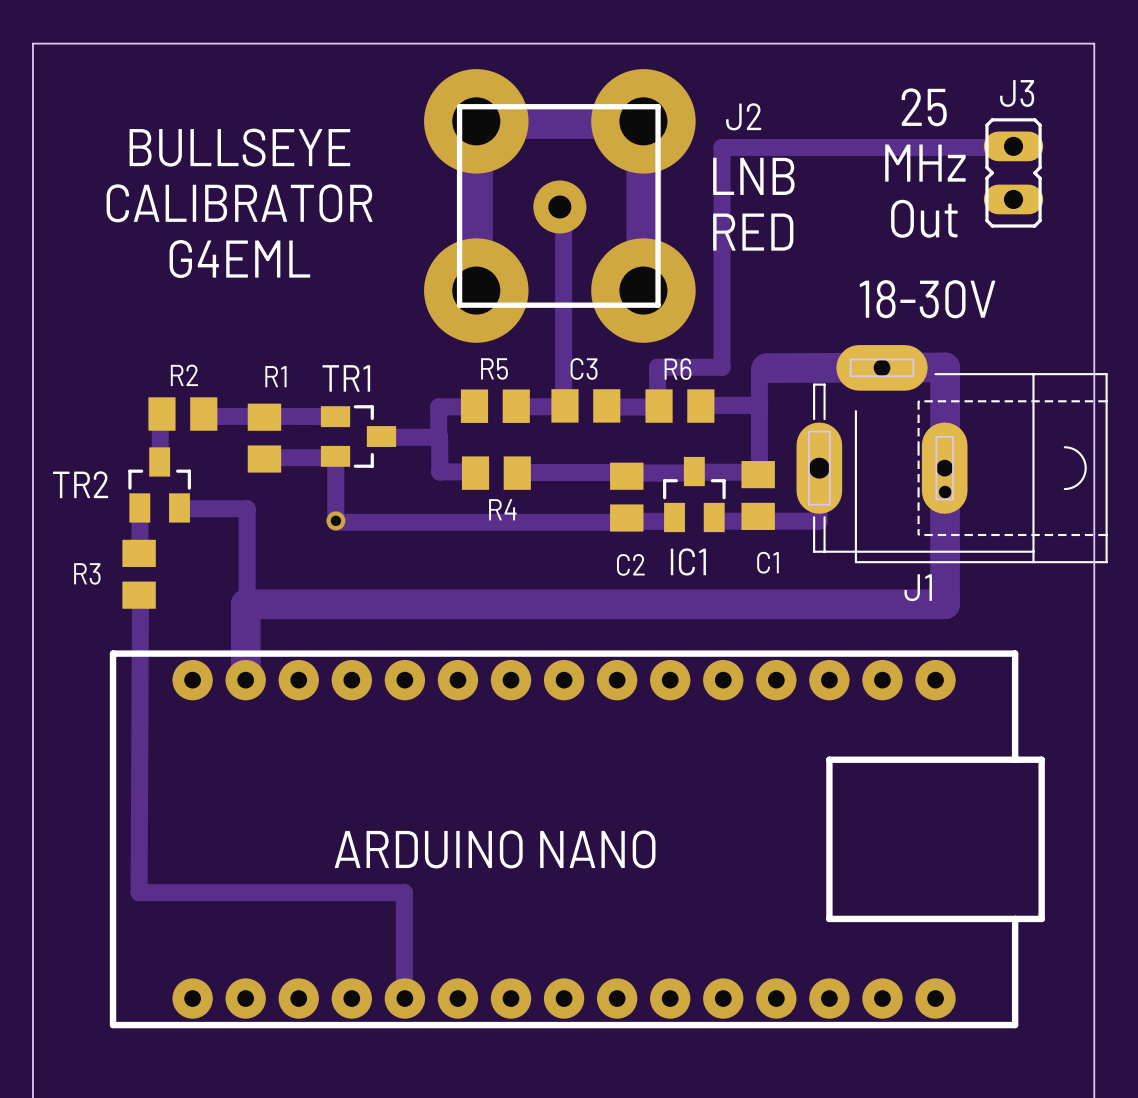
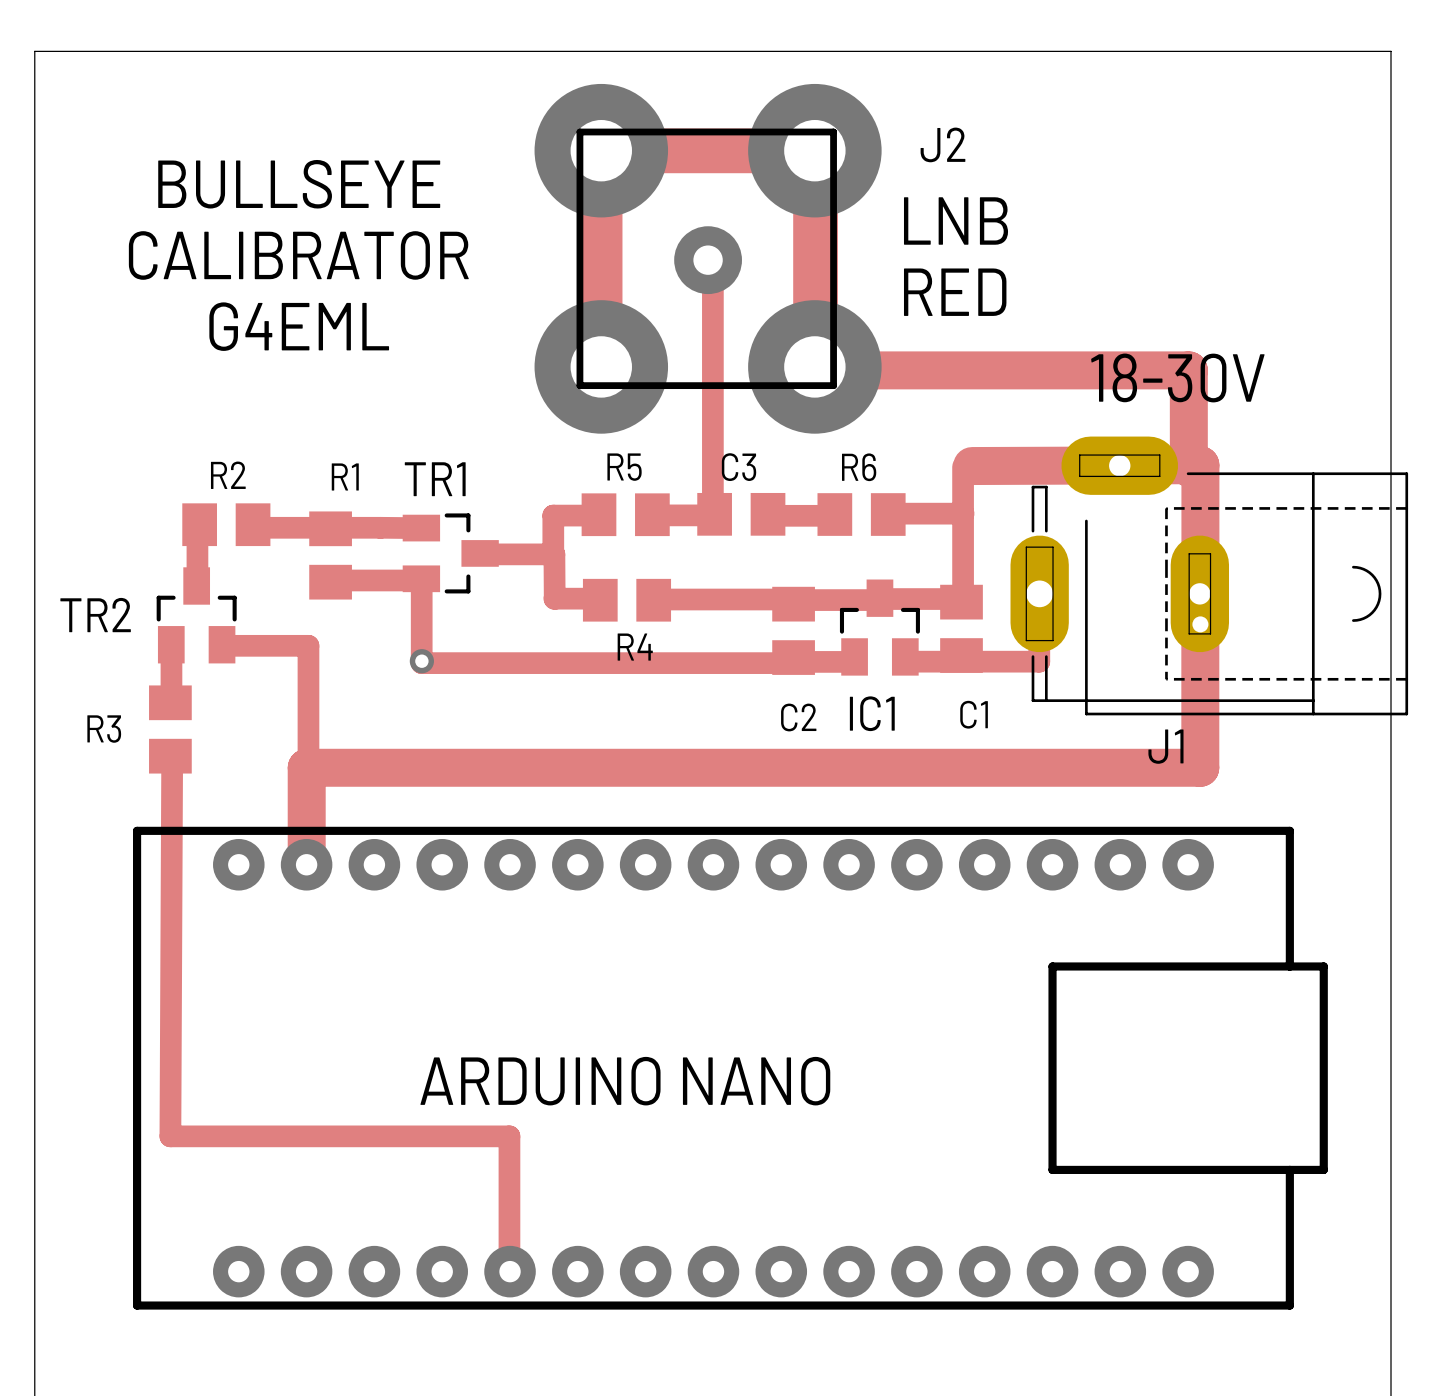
text: 25 (924, 107) -> none
track: (1017, 147) (722, 147) (722, 367) (657, 367) (657, 407) -> none
text: MHz (925, 163) -> none
J3: (1013, 172) -> none
text: Out (924, 218) -> none
track: none -> (815, 370) (1188, 370) (1188, 467)

